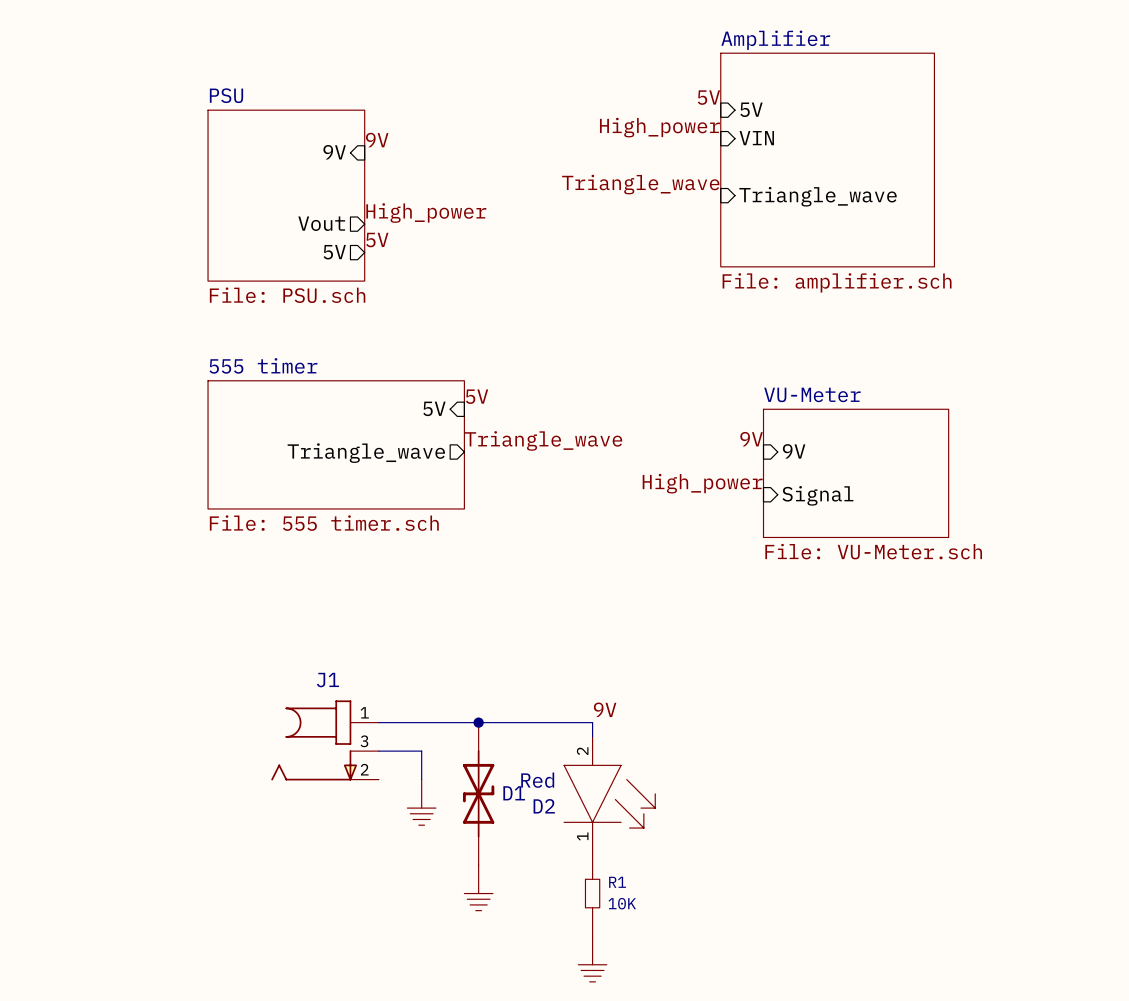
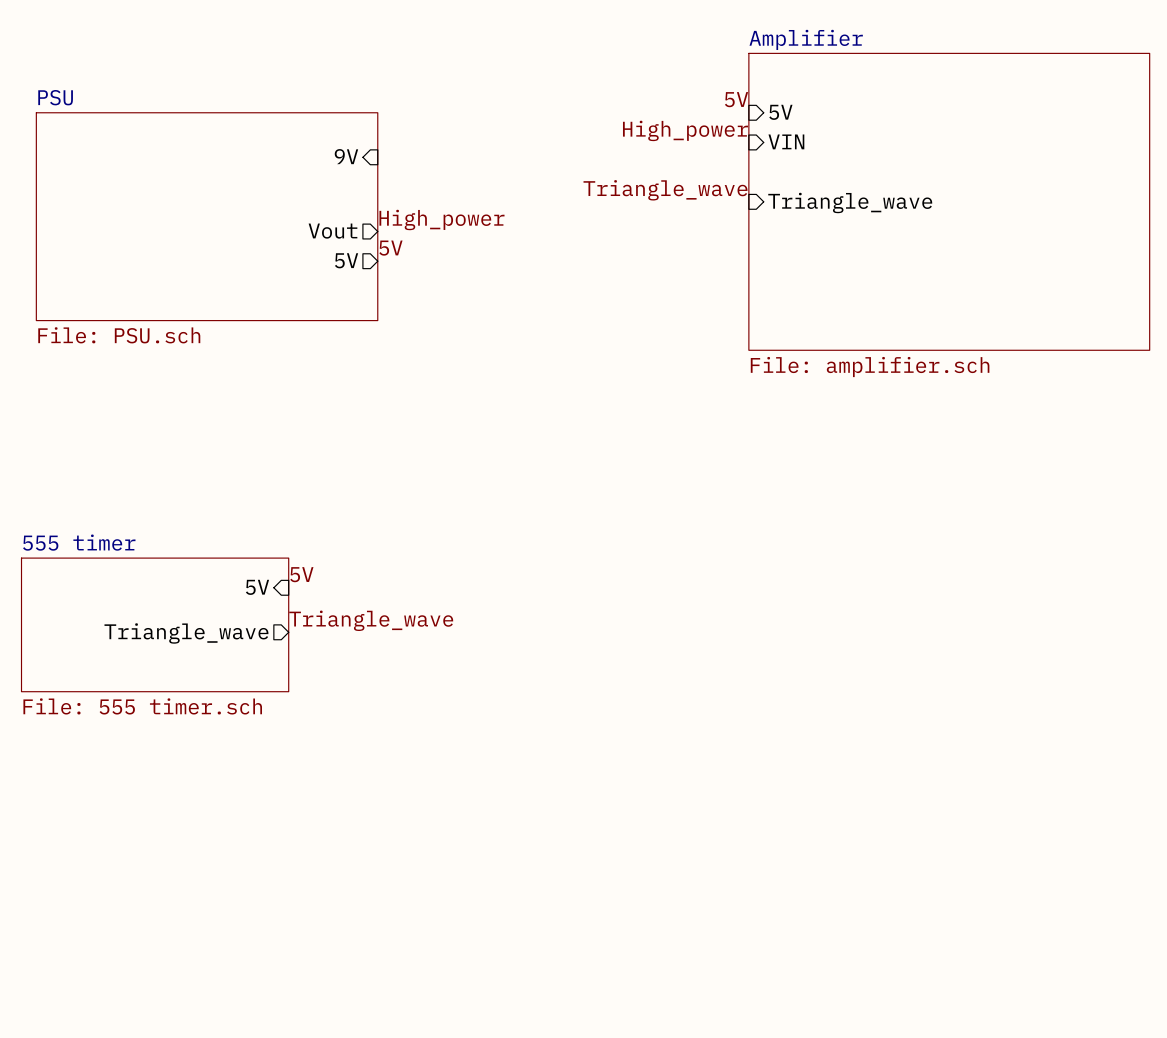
label: 9V (377, 140) -> none
sheet Amplifier: File: amplifier.sch (827, 160) -> none
sheet PSU: File: PSU.sch (286, 195) -> none
sheet Amplifier: none -> File: amplifier.sch (949, 201)
sheet PSU: none -> File: PSU.sch (207, 216)
label position: 5V (477, 396) -> 5V (301, 574)
sheet pin position: 5V (434, 408) -> 5V (257, 587)
label: 9V (751, 439) -> none
label position: Triangle_wave (543, 440) -> Triangle_wave (371, 620)
sheet 555 timer position: (336, 444) -> (155, 624)
sheet pin: 9V (794, 451) -> none
sheet pin position: Triangle_wave (366, 453) -> Triangle_wave (186, 633)
sheet VU-Meter: File: VU-Meter.sch (856, 473) -> none
label: High_power (702, 483) -> none
sheet pin: Signal (817, 495) -> none
label: 9V (605, 709) -> none
wire: (378, 722) (592, 722) (592, 736) -> none
junction: (478, 722) -> none
J1: (325, 740) -> none
wire: (378, 751) (421, 751) (421, 779) -> none
D1: (478, 793) -> none
D2: (609, 793) -> none
power symbol: (421, 802) -> none
power symbol: (478, 887) -> none
R1: (592, 893) -> none
power symbol: (592, 959) -> none

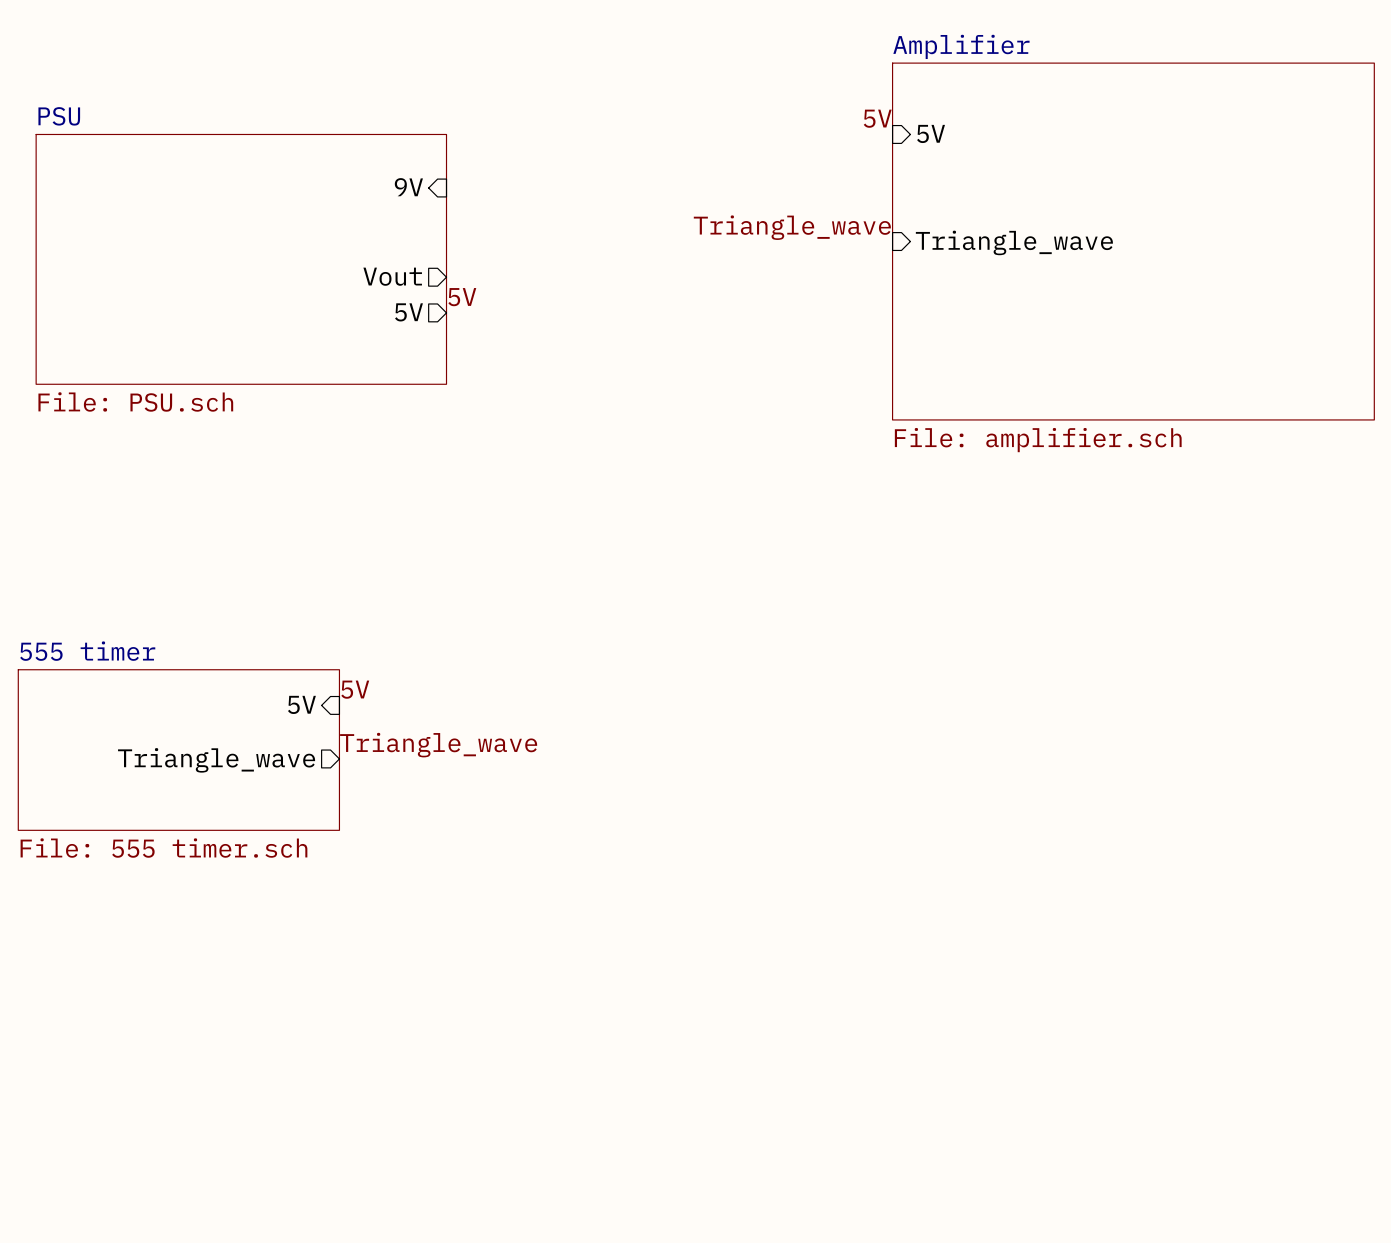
label: High_power (685, 130) -> none
sheet pin: VIN (786, 141) -> none
label: High_power (441, 219) -> none

